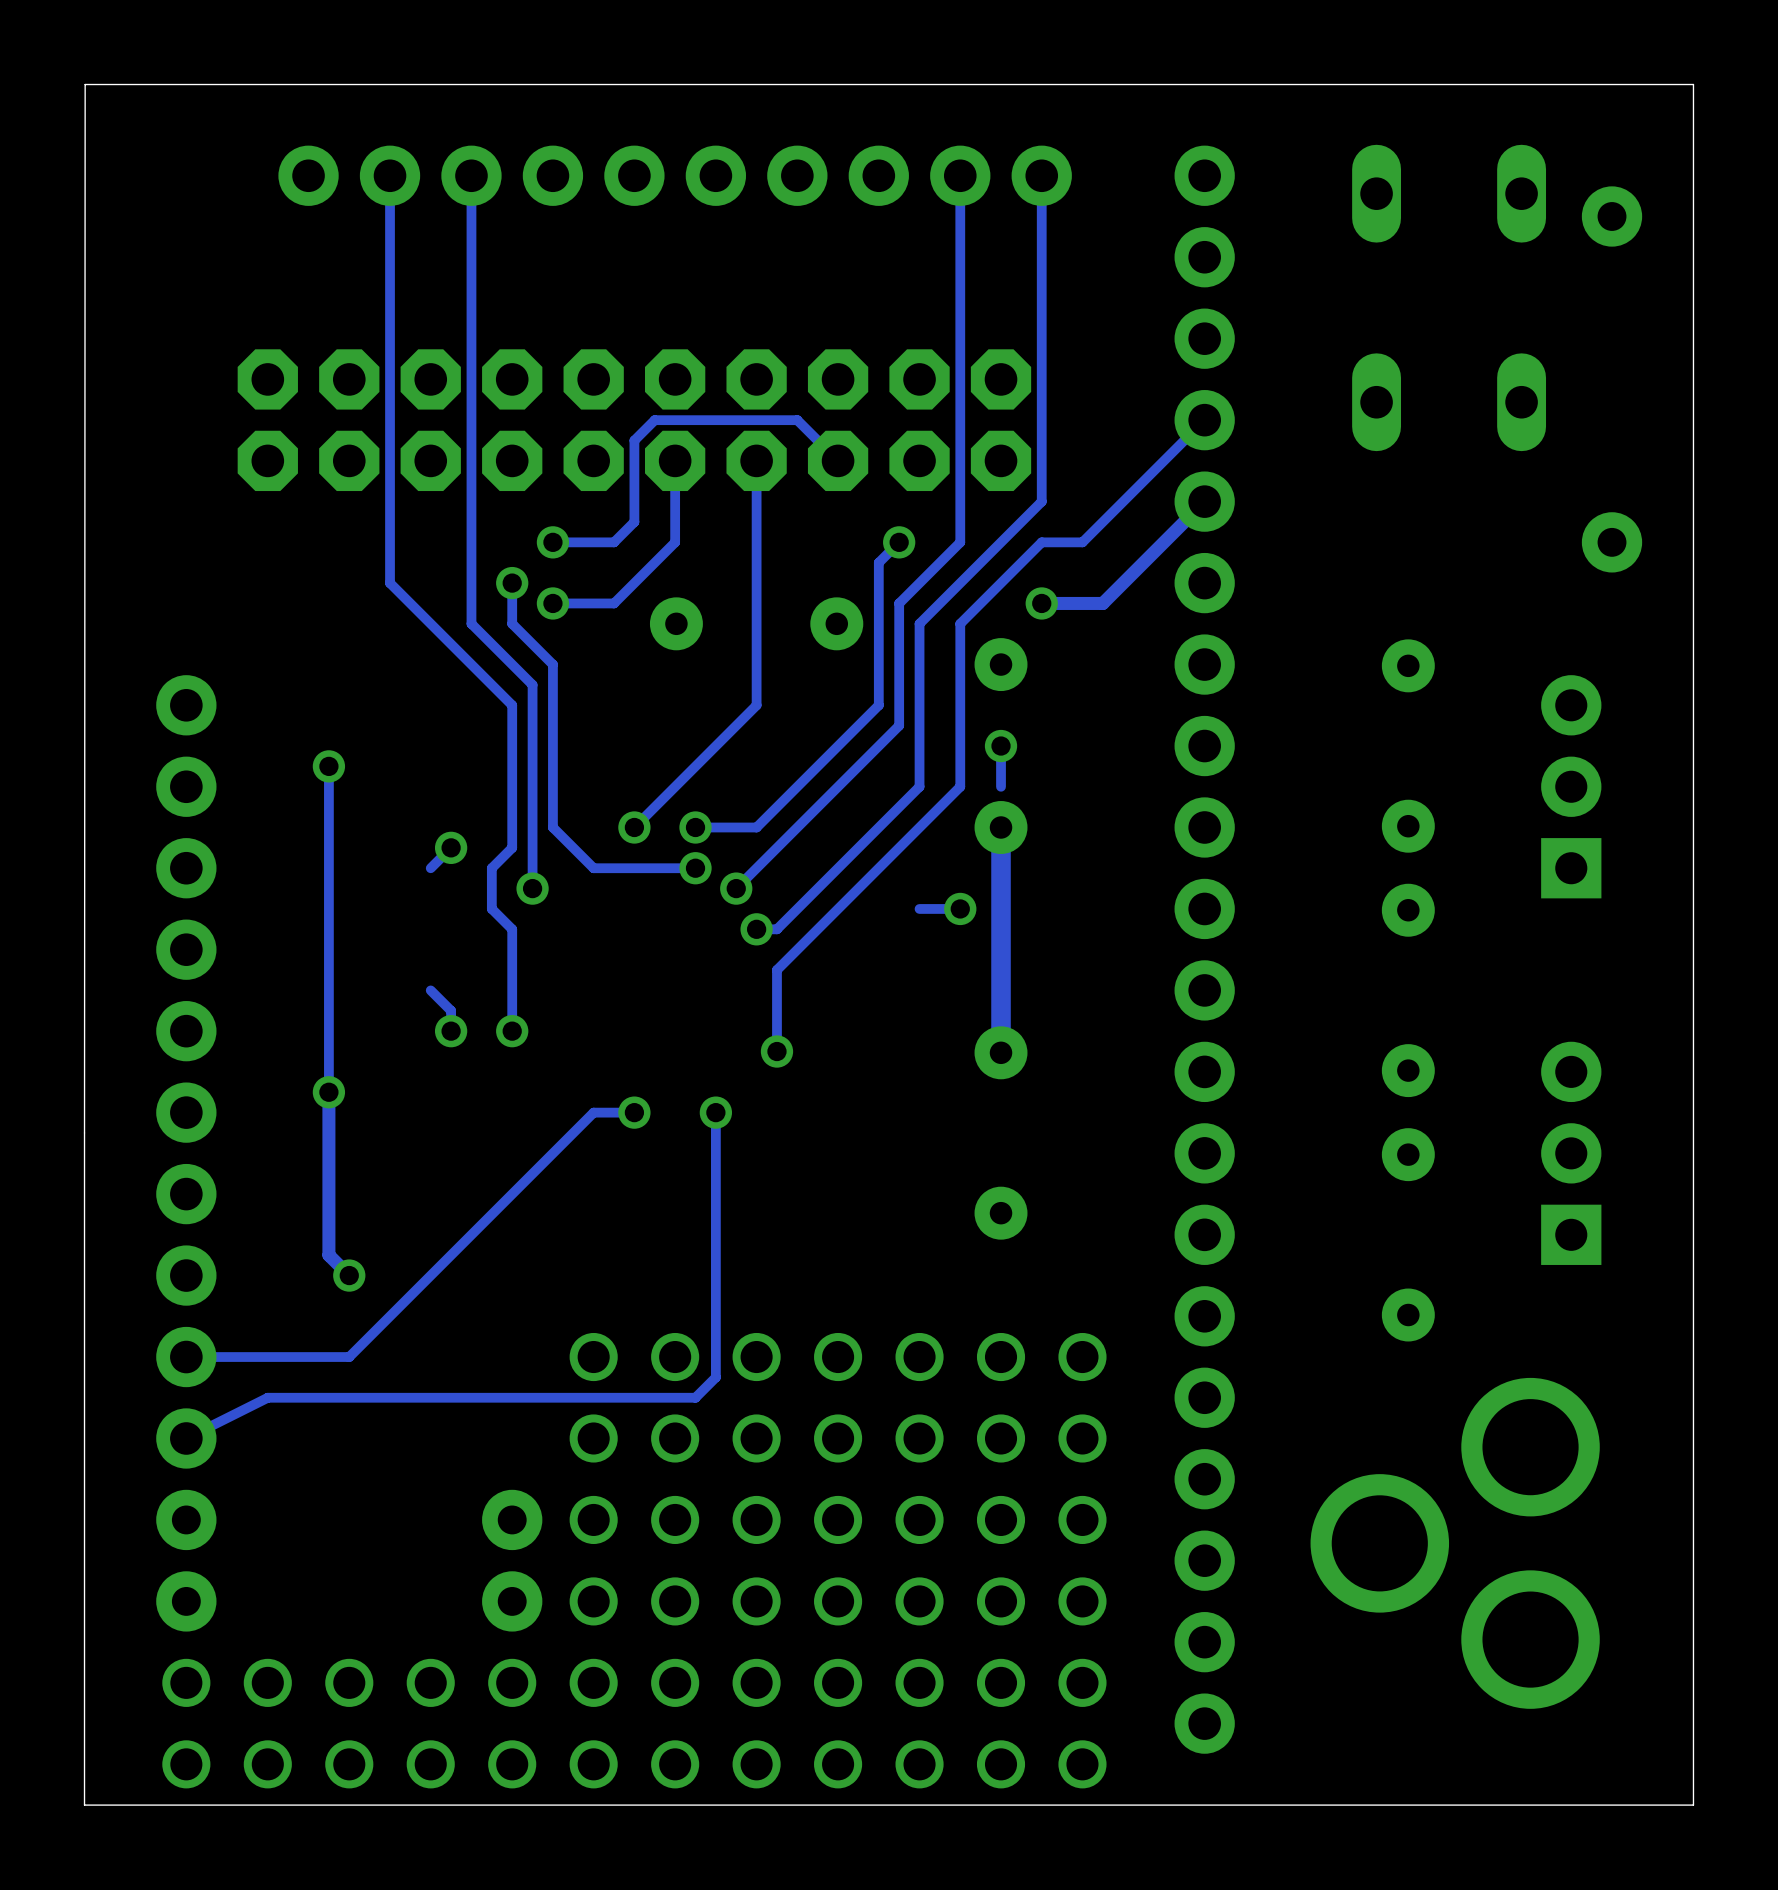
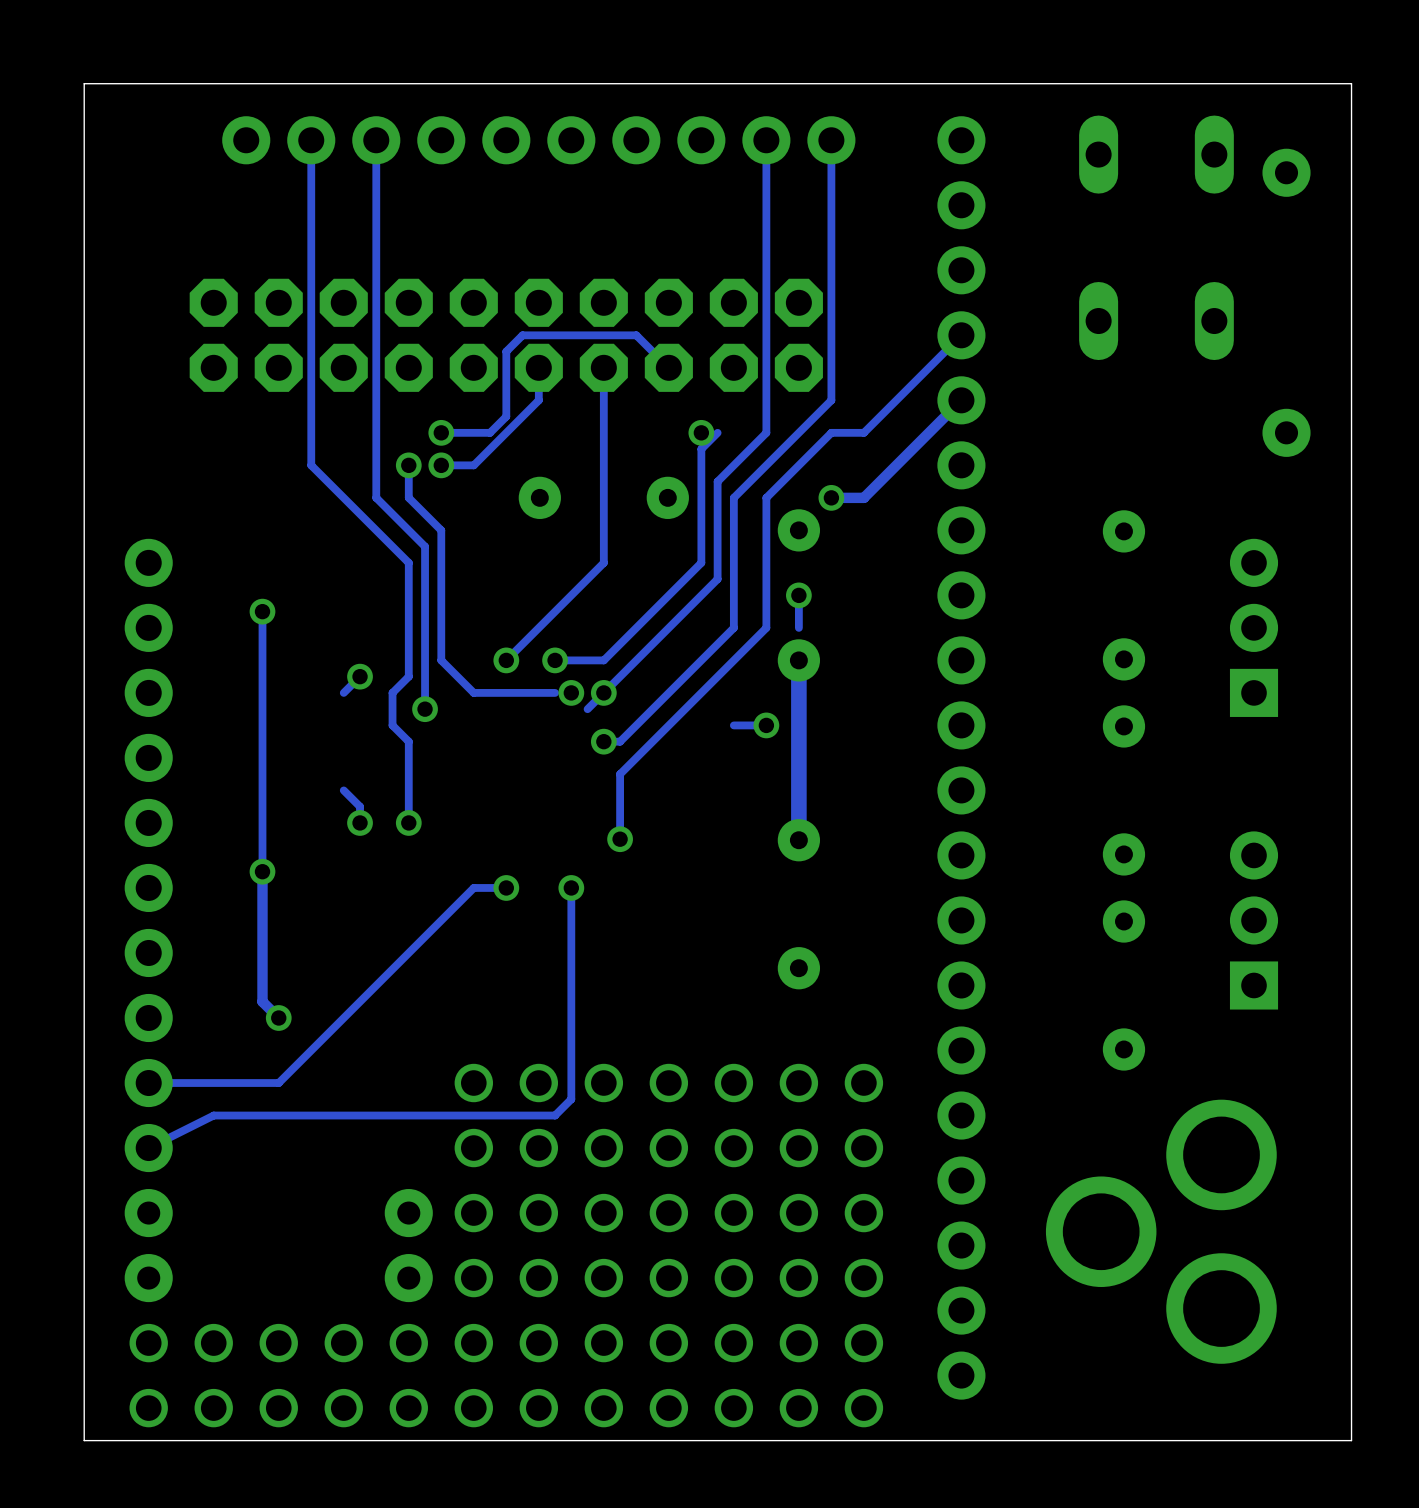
board edge: (1693, 104) (1693, 84) (85, 84) (84, 1805) (105, 1805) -> (1351, 83) (84, 83) (84, 1440)
track: (675, 501) (675, 542) (614, 603) (552, 603) -> (538, 400) (473, 465) (441, 465)
via position: (899, 542) -> (701, 432)
via position: (552, 603) -> (441, 465)
via position: (1041, 603) -> (831, 497)
track: (1102, 603) (1041, 603) -> (880, 481) (863, 497) (831, 497)
via: (695, 868) -> none
via: none -> (571, 692)
via: none -> (603, 692)
via: (736, 888) -> none

